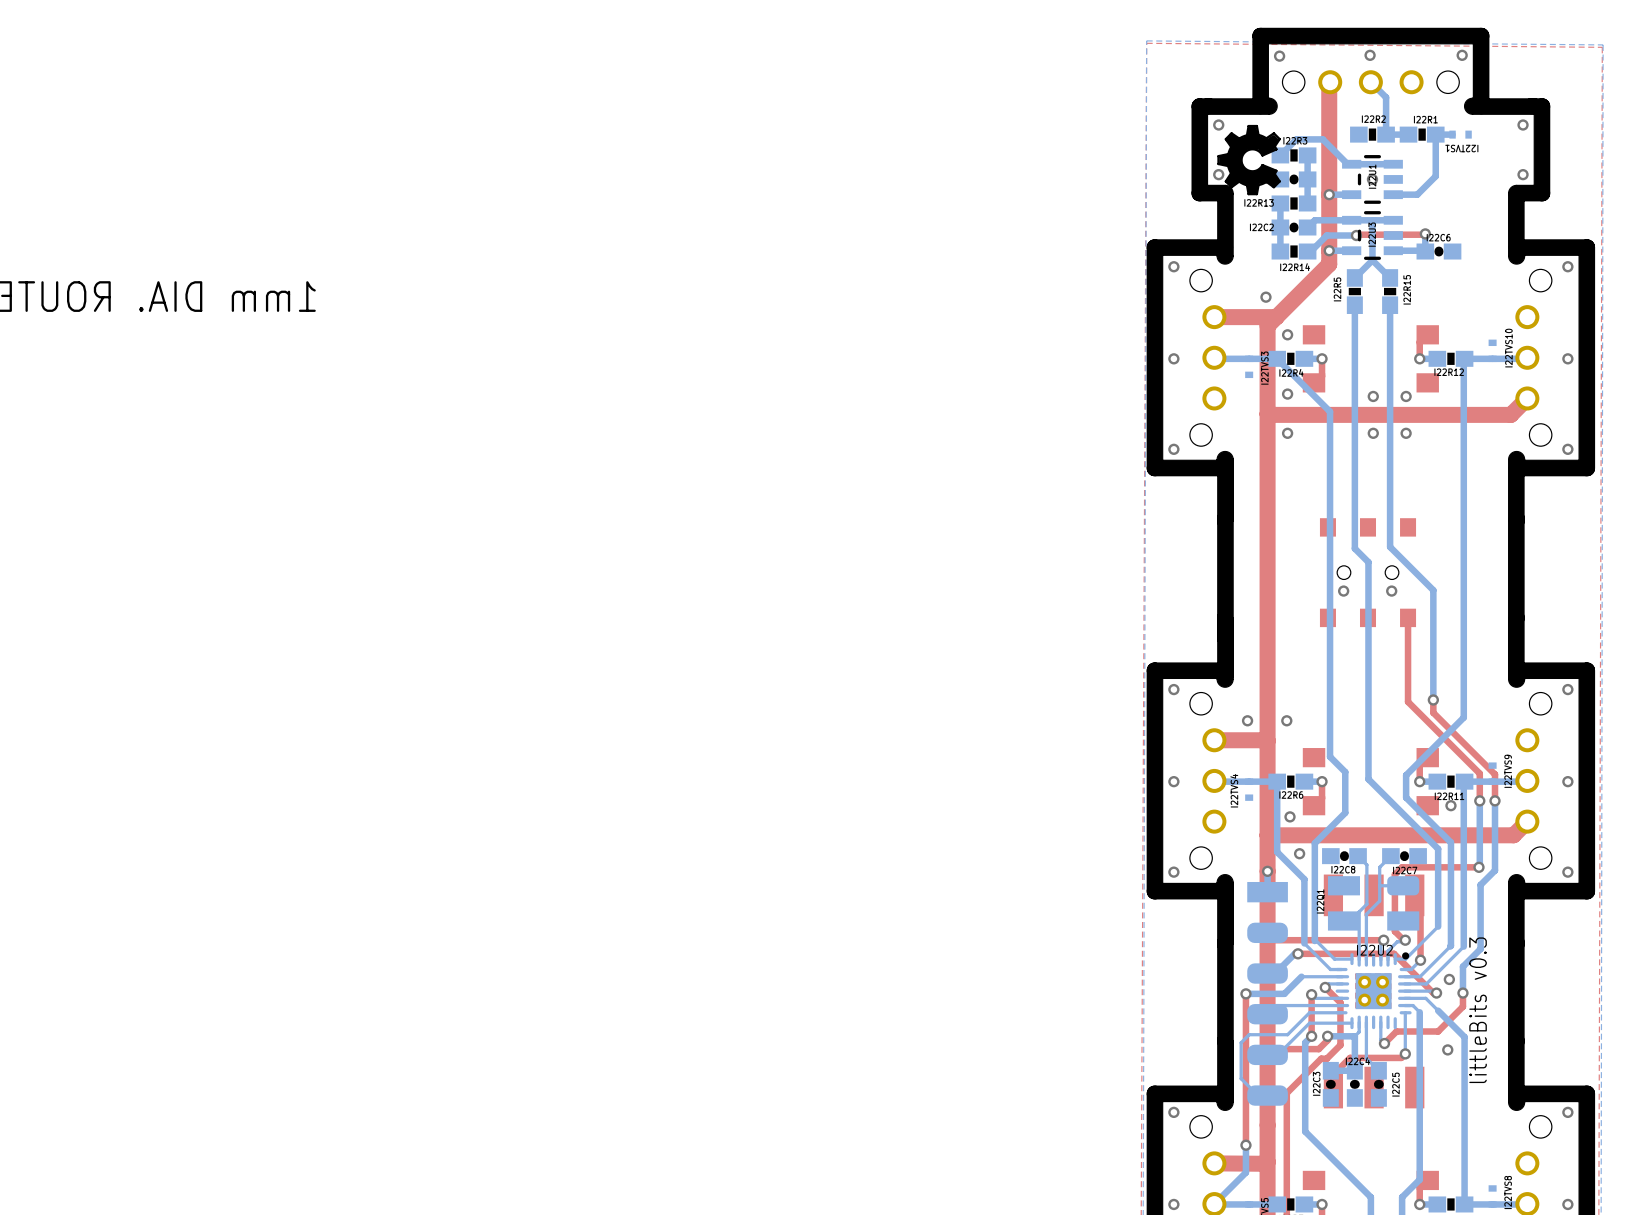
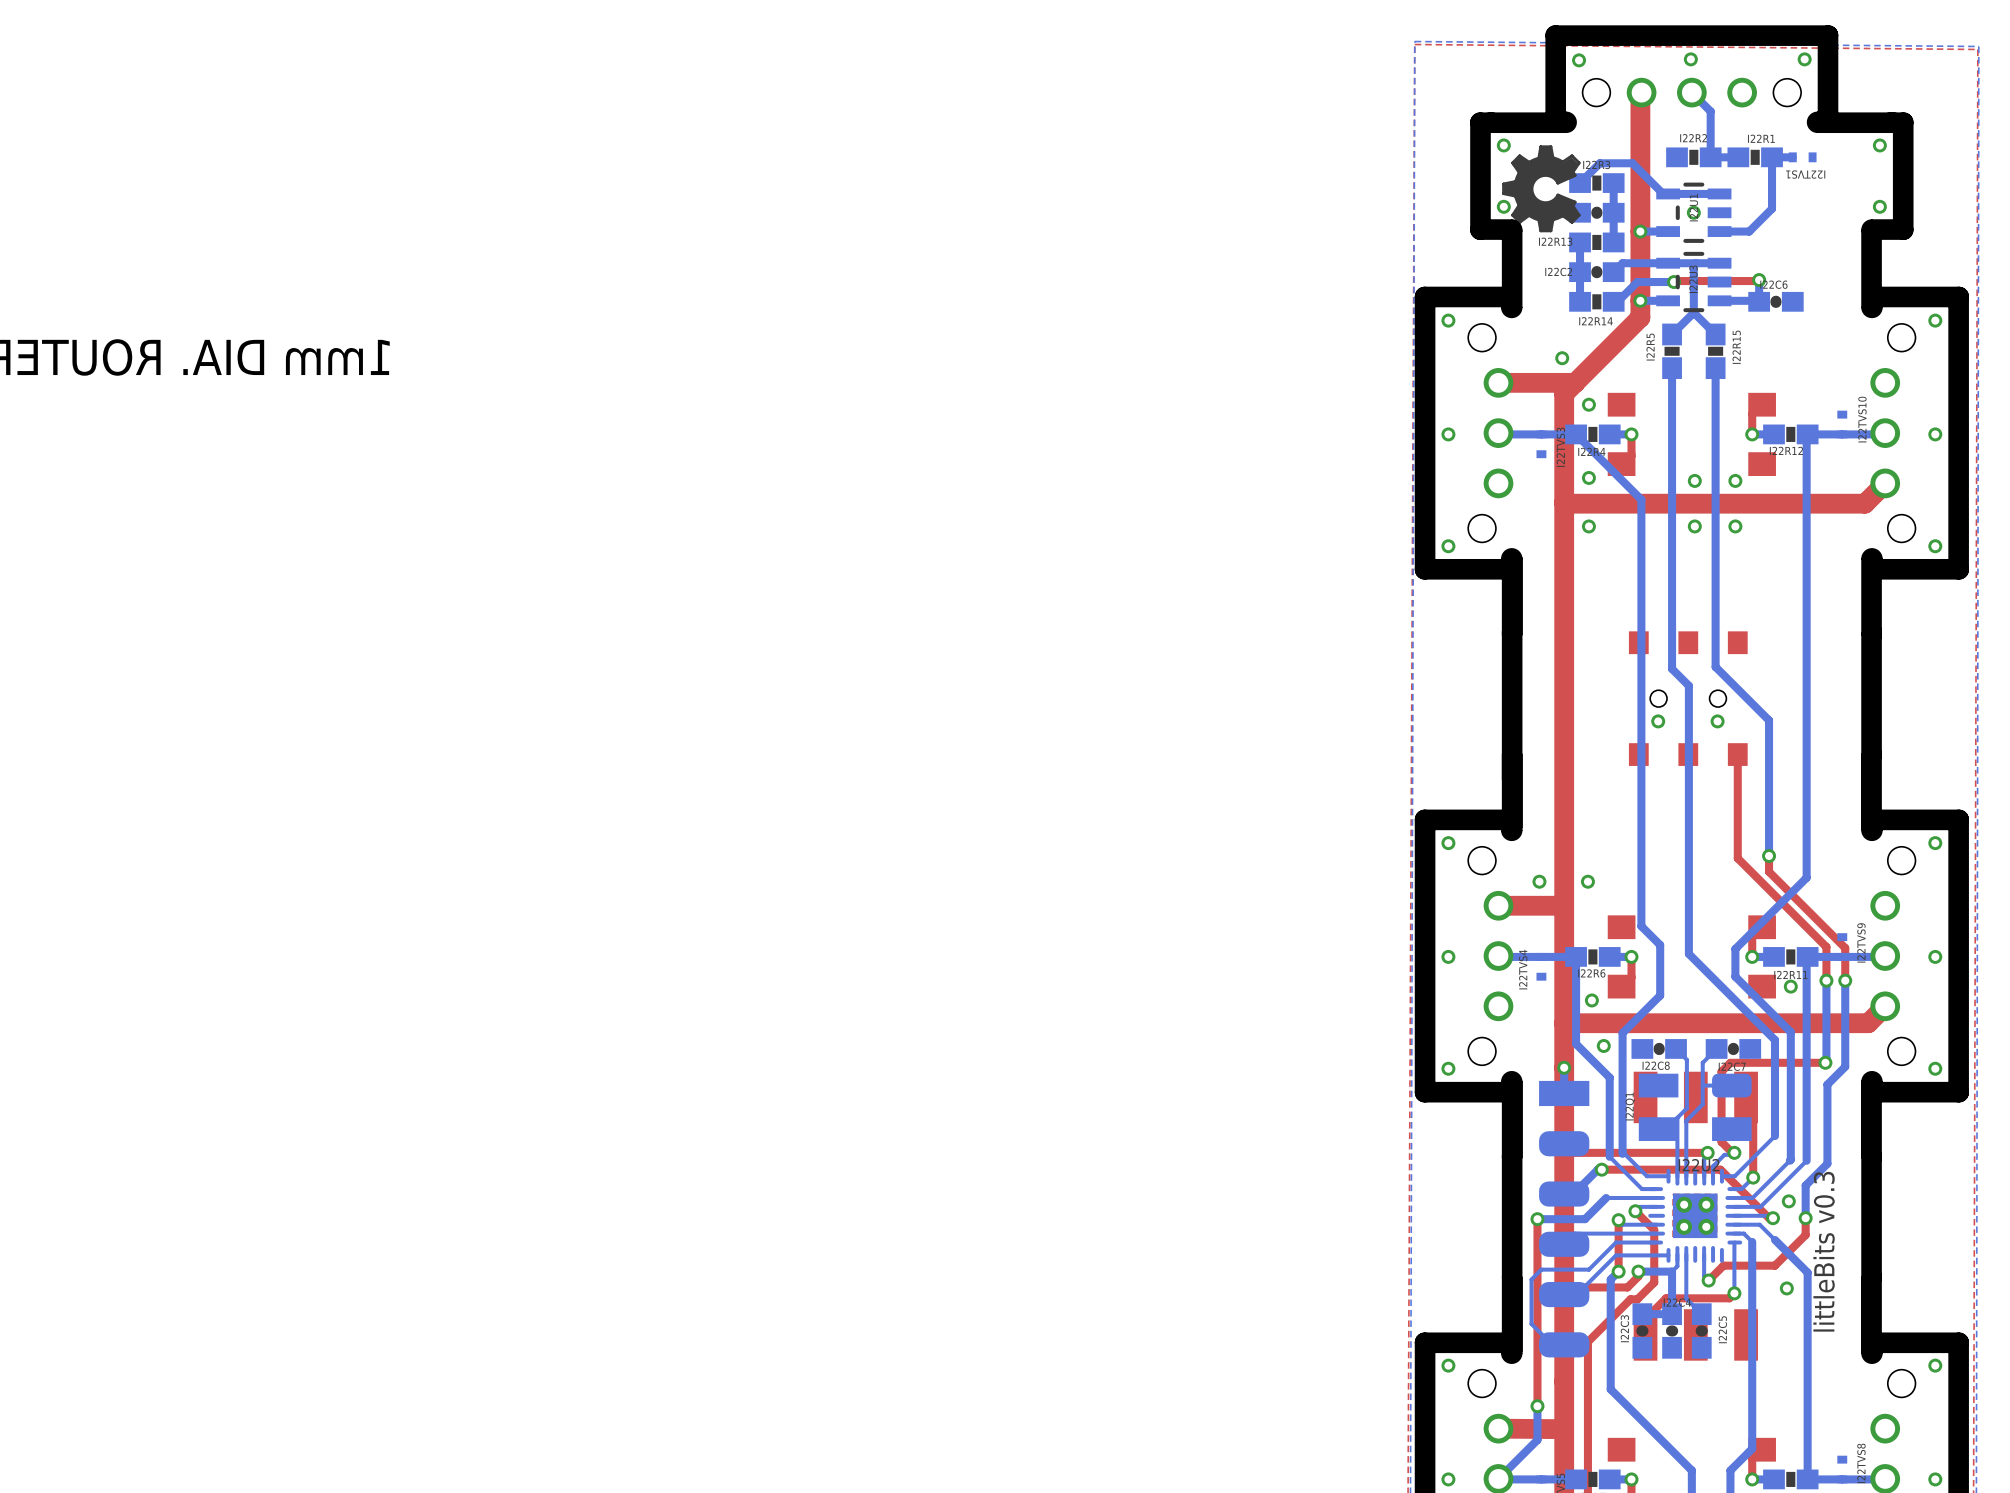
I22U2 footprint: [1335, 952, 1412, 1030] -> [1648, 1168, 1743, 1263]

